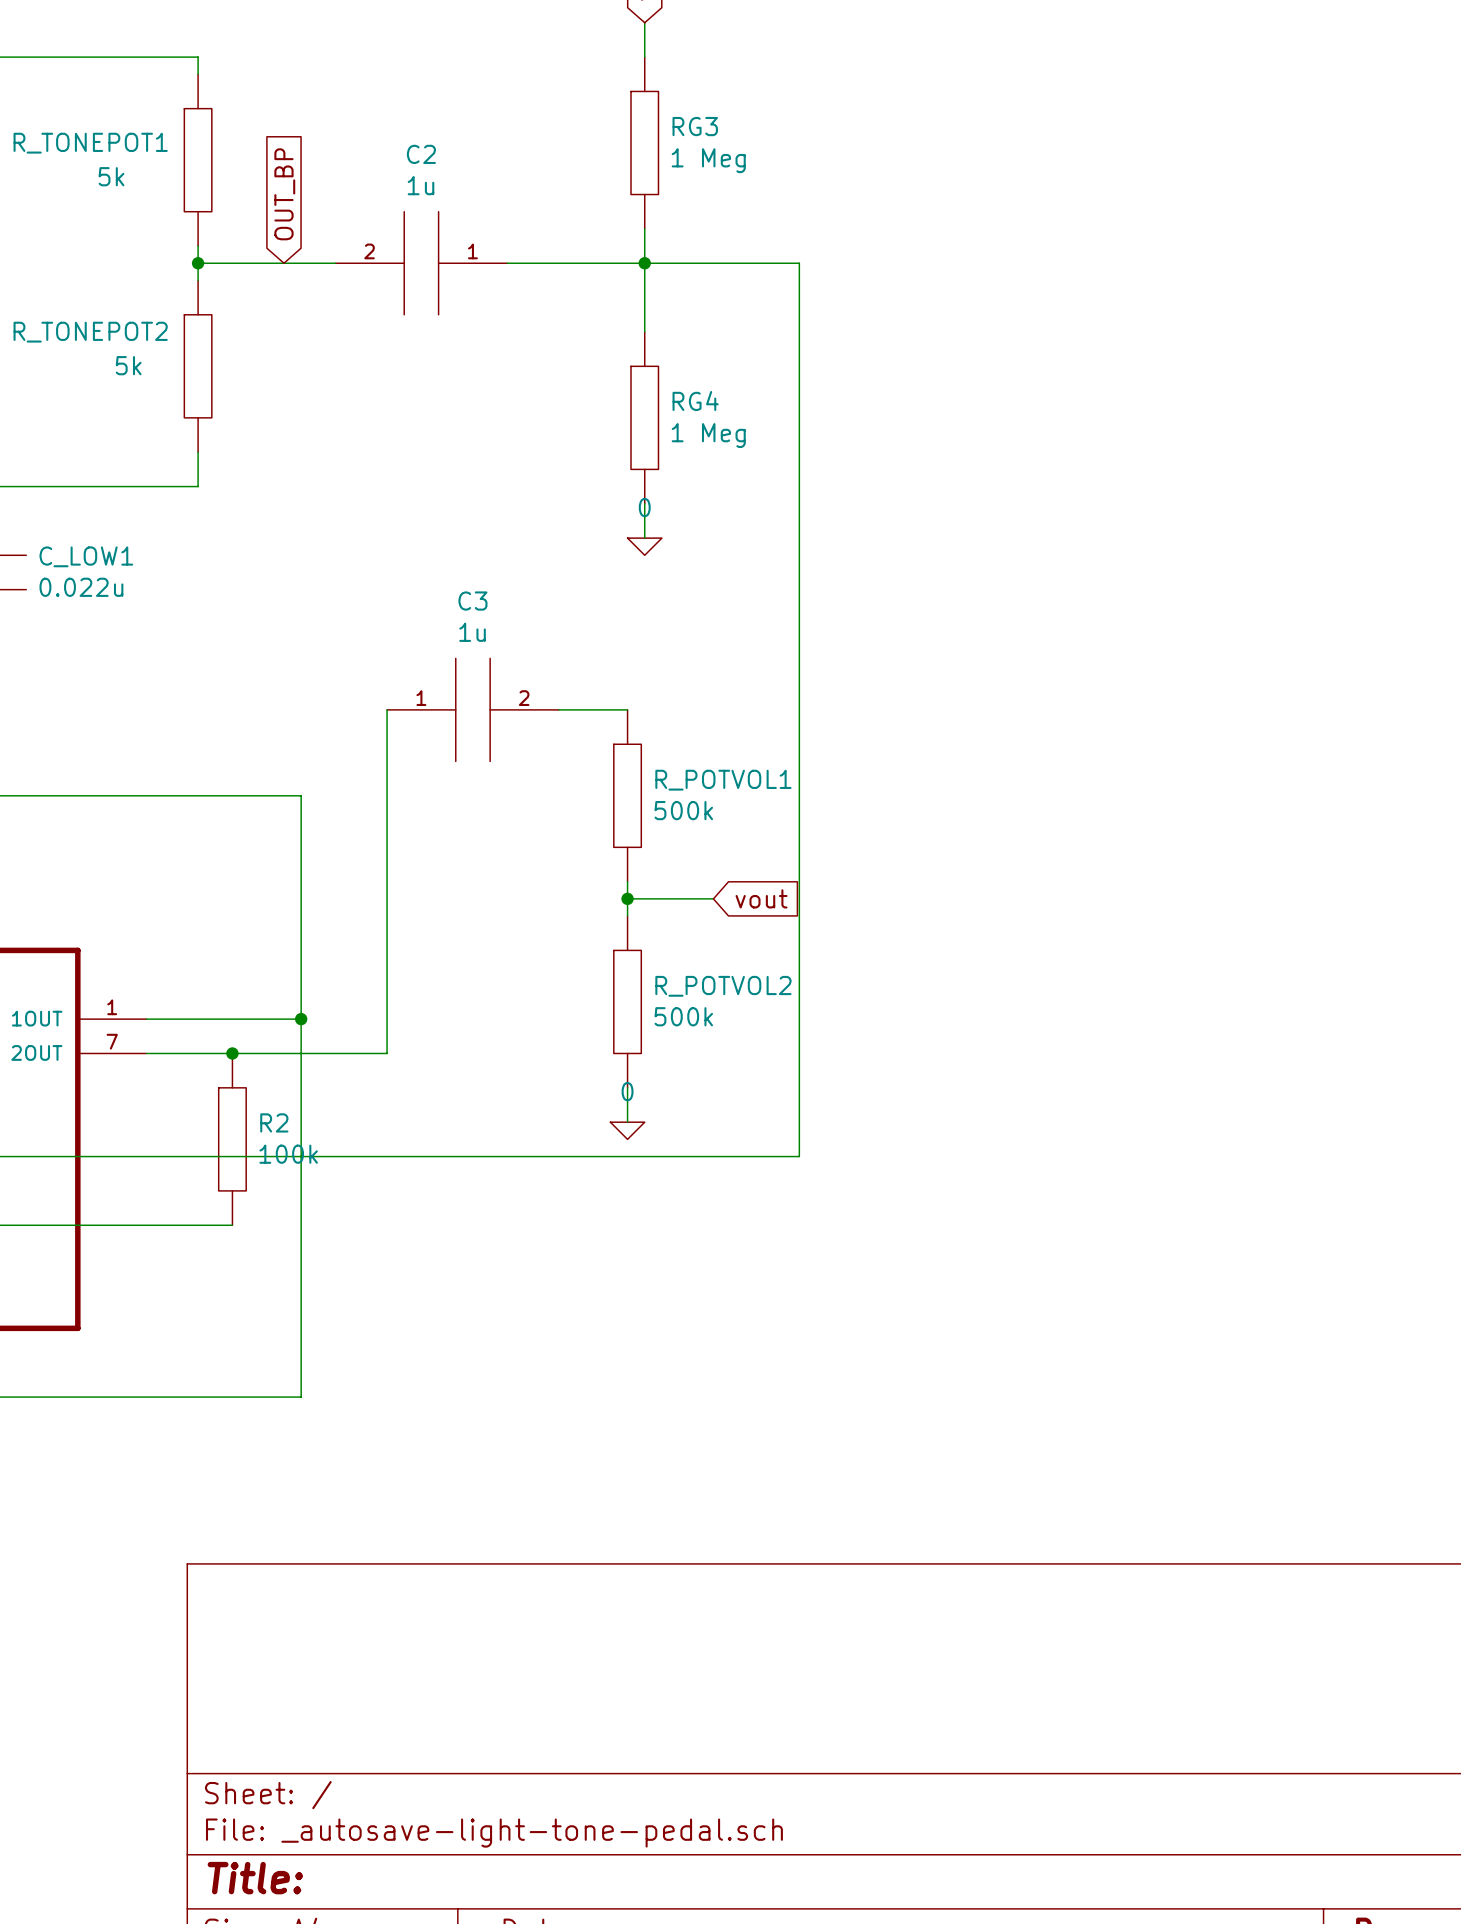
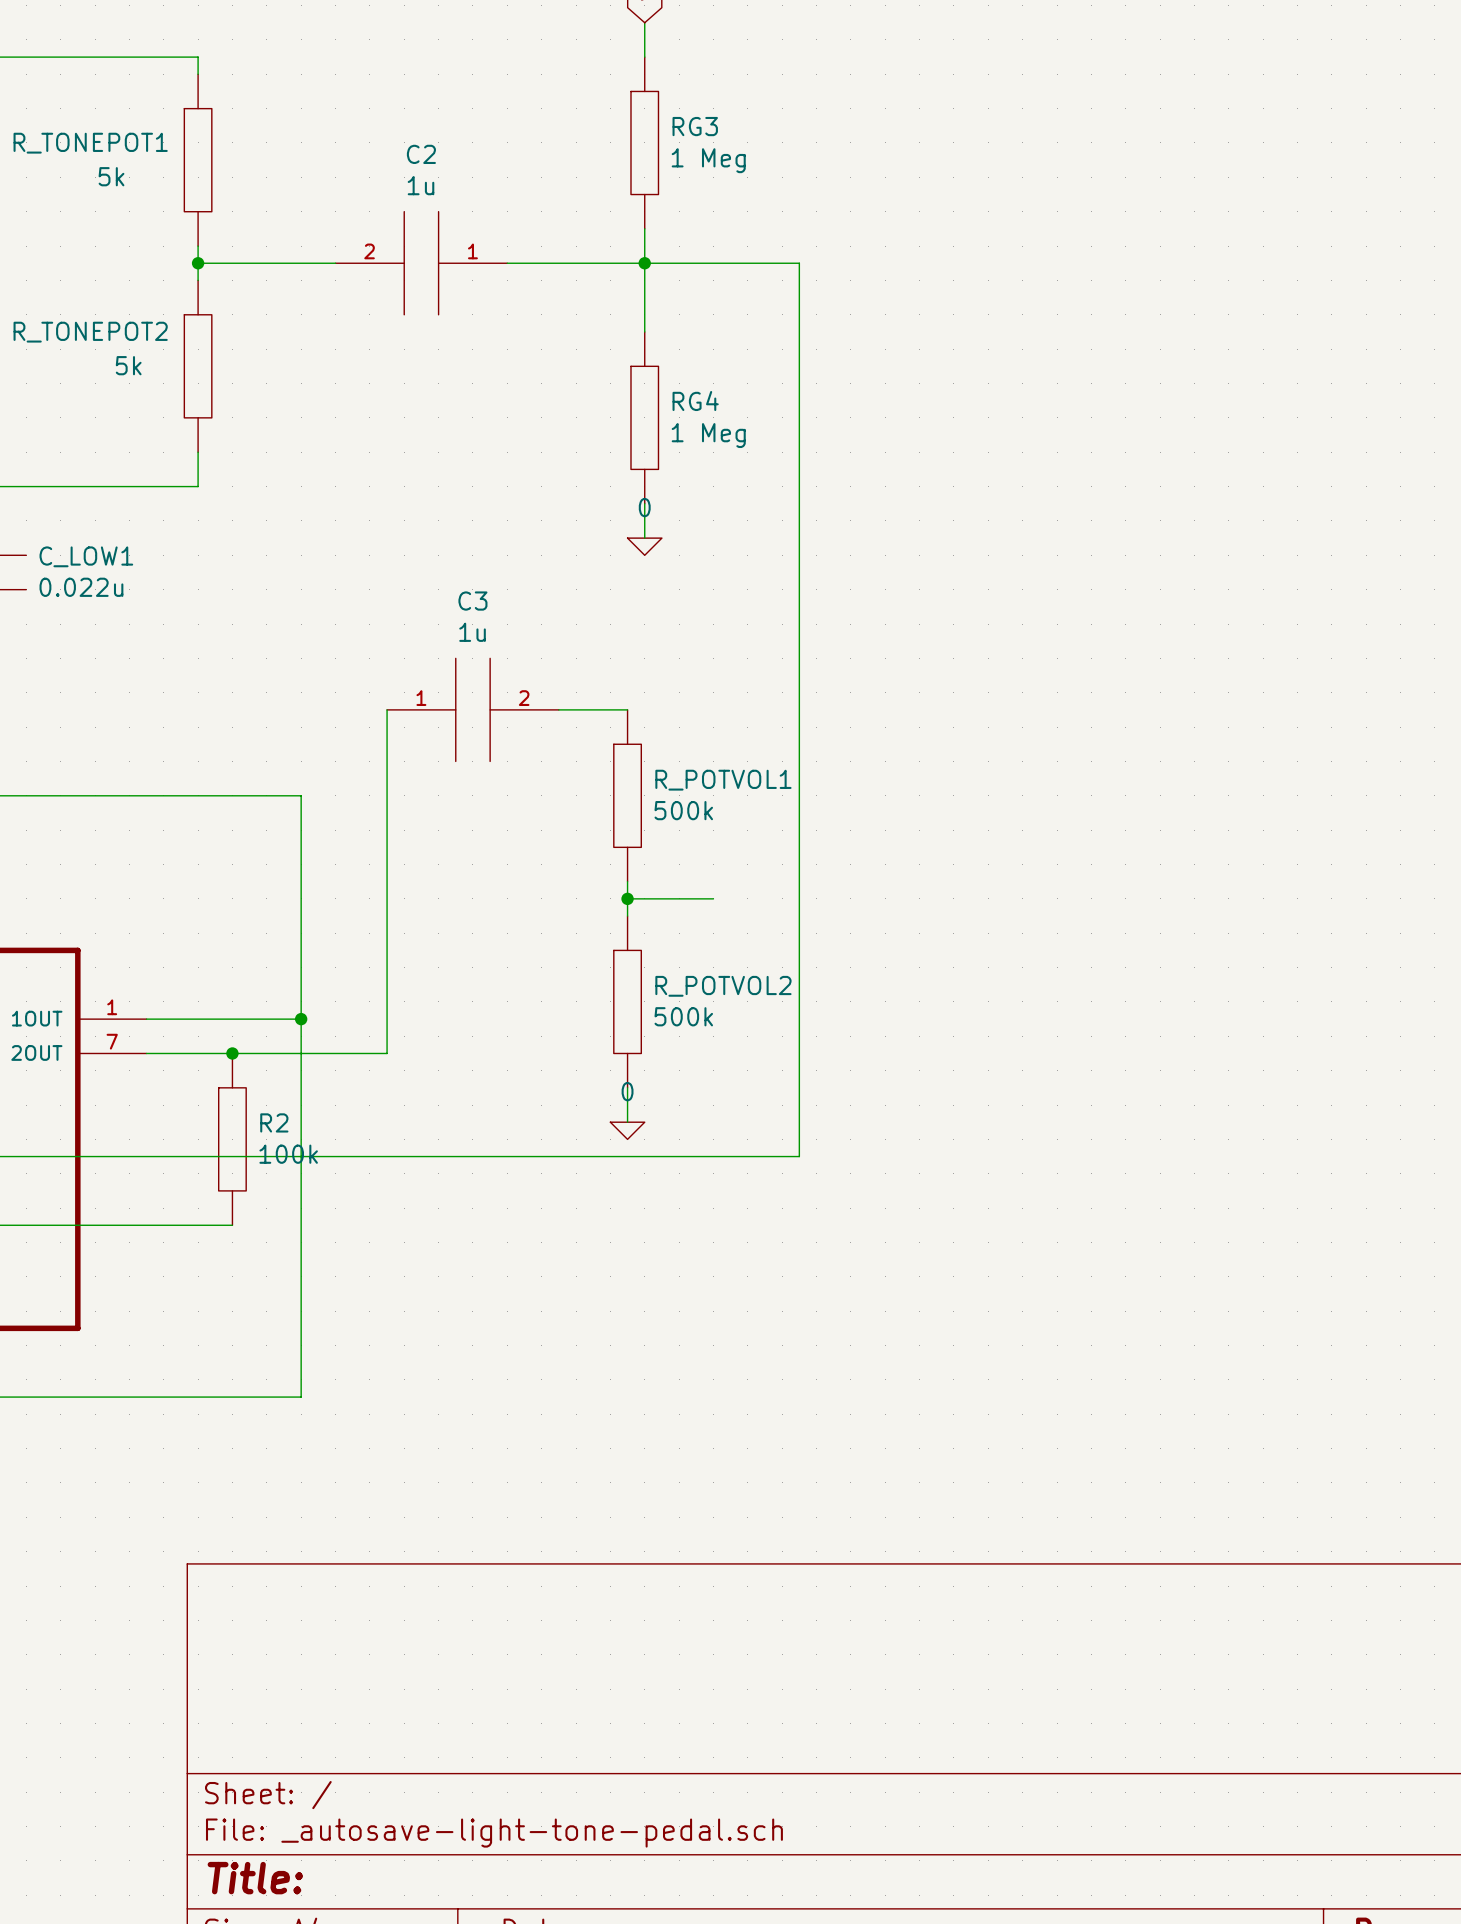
global label: OUT_BP (284, 194) -> none
global label: vout (761, 898) -> none

